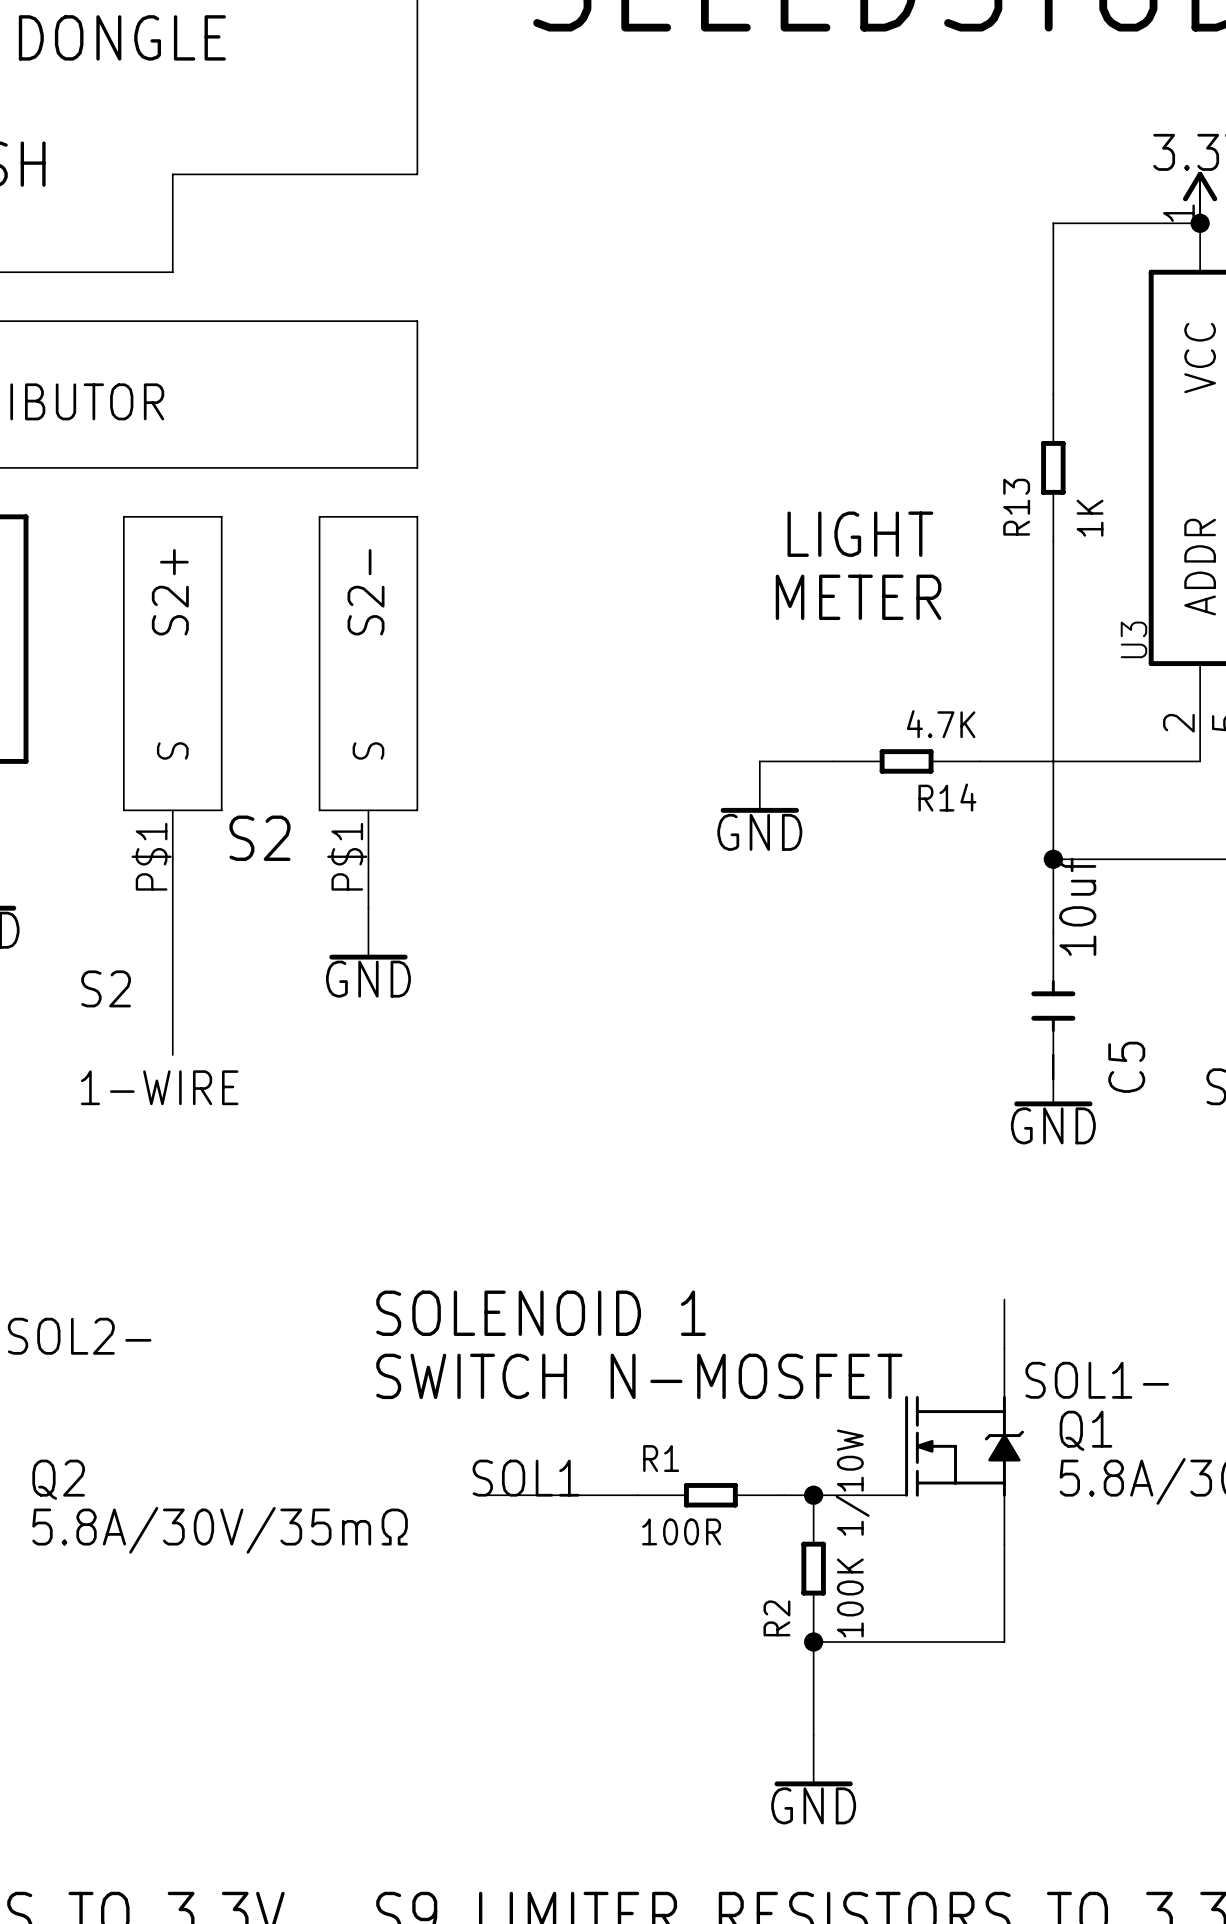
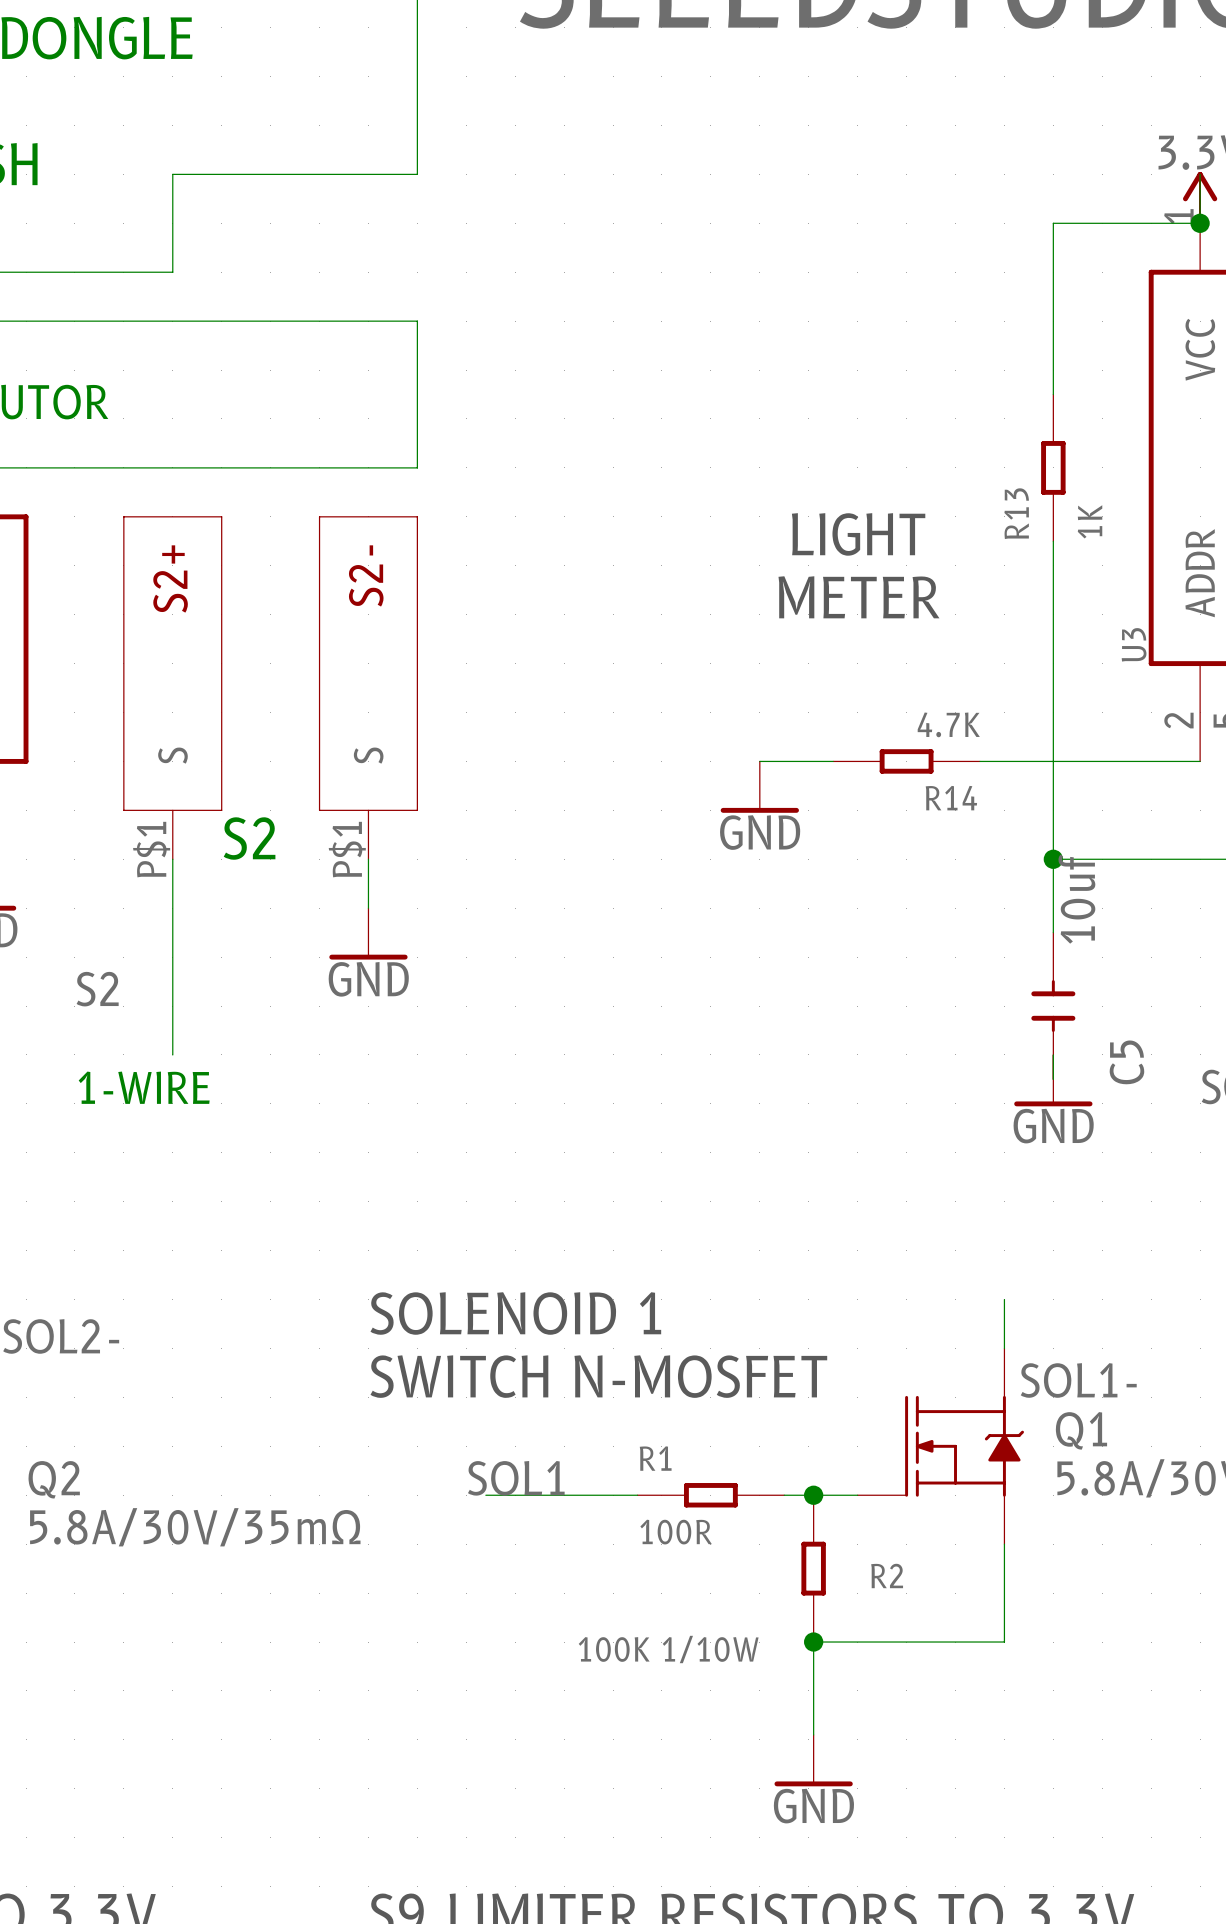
R2 value rotation: 0° (852, 1533) -> 90° clockwise (668, 1649)
R2 value position: 100K 1/10W (852, 1533) -> 100K 1/10W (668, 1649)
R2 name rotation: 0° (776, 1618) -> 90° clockwise (887, 1575)
R2 name position: R2 (776, 1618) -> R2 (887, 1575)

